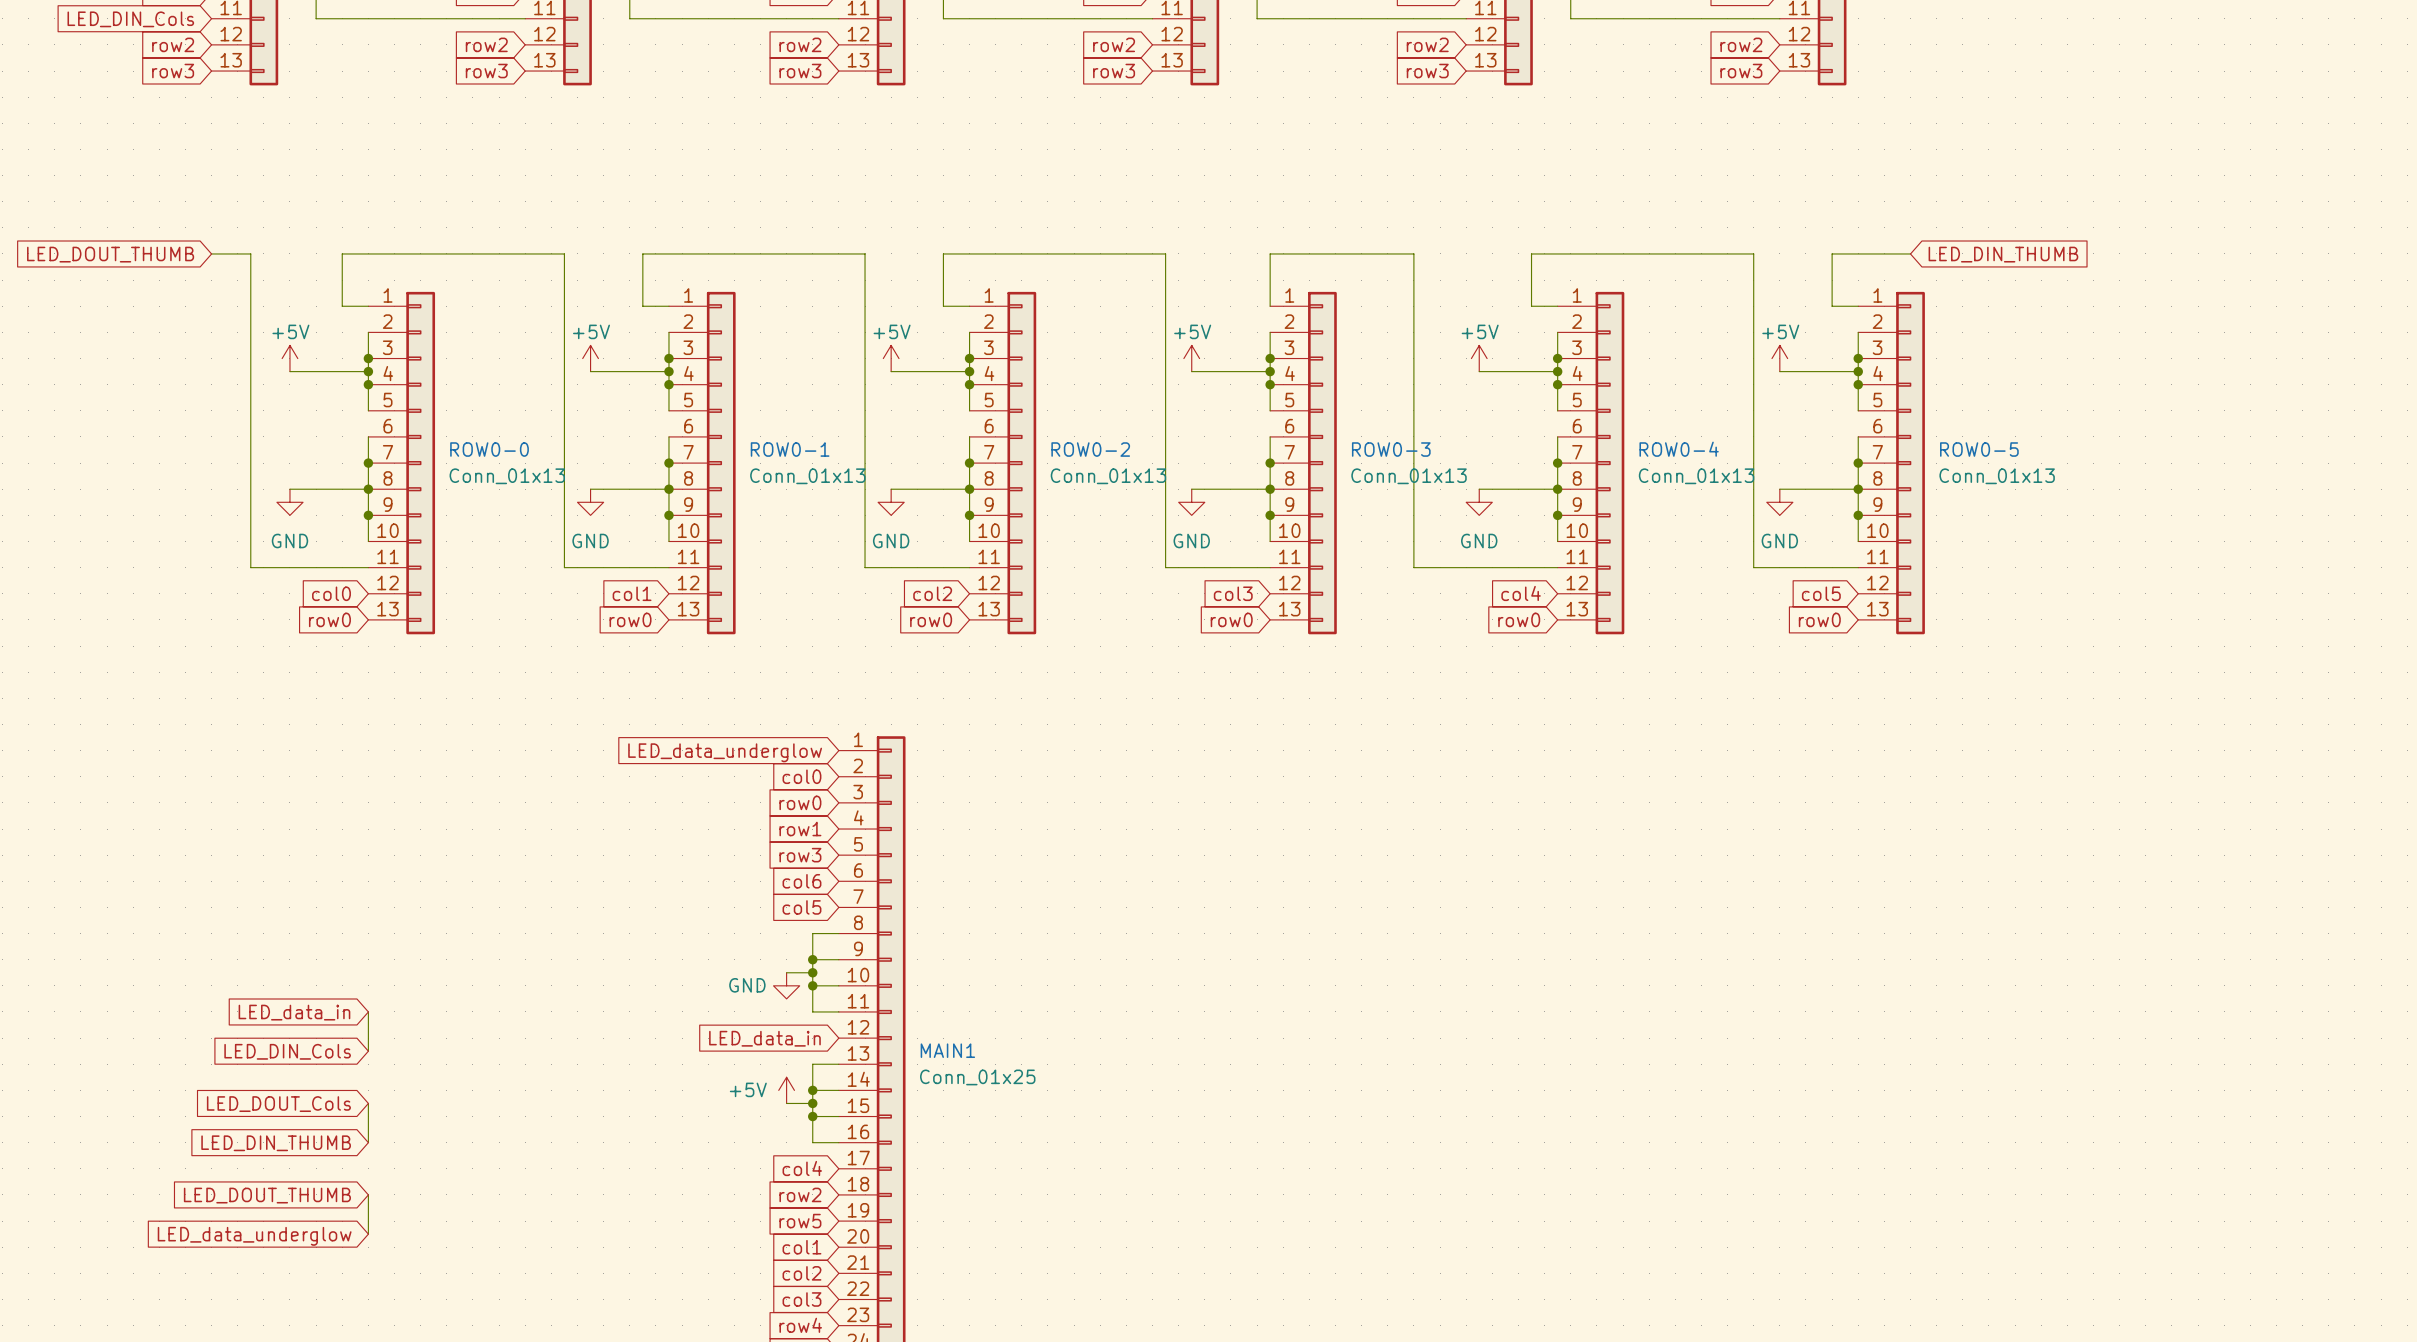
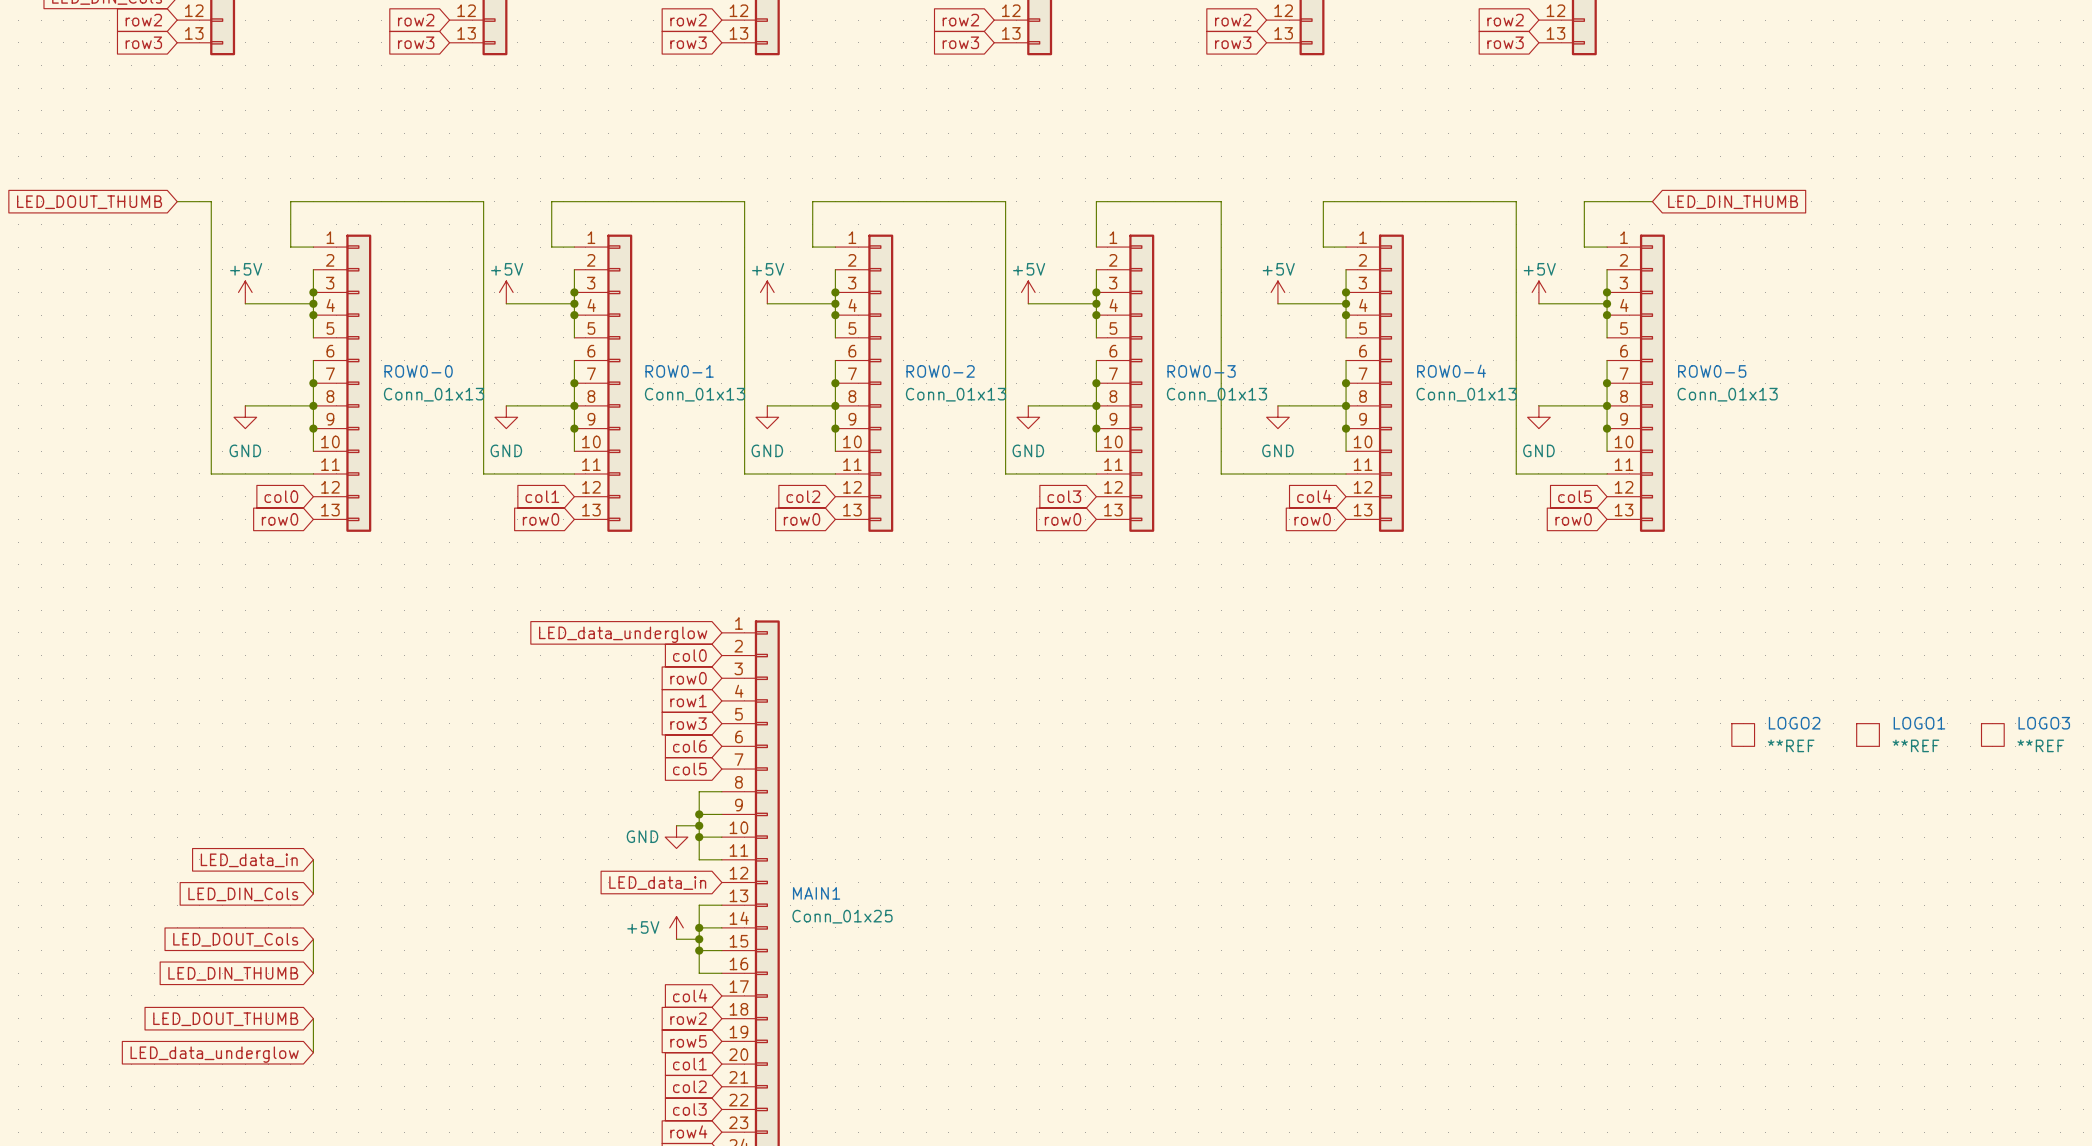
LOGO2: none -> **REF (1743, 734)
LOGO1: none -> **REF (1868, 734)
LOGO3: none -> **REF (1992, 734)

